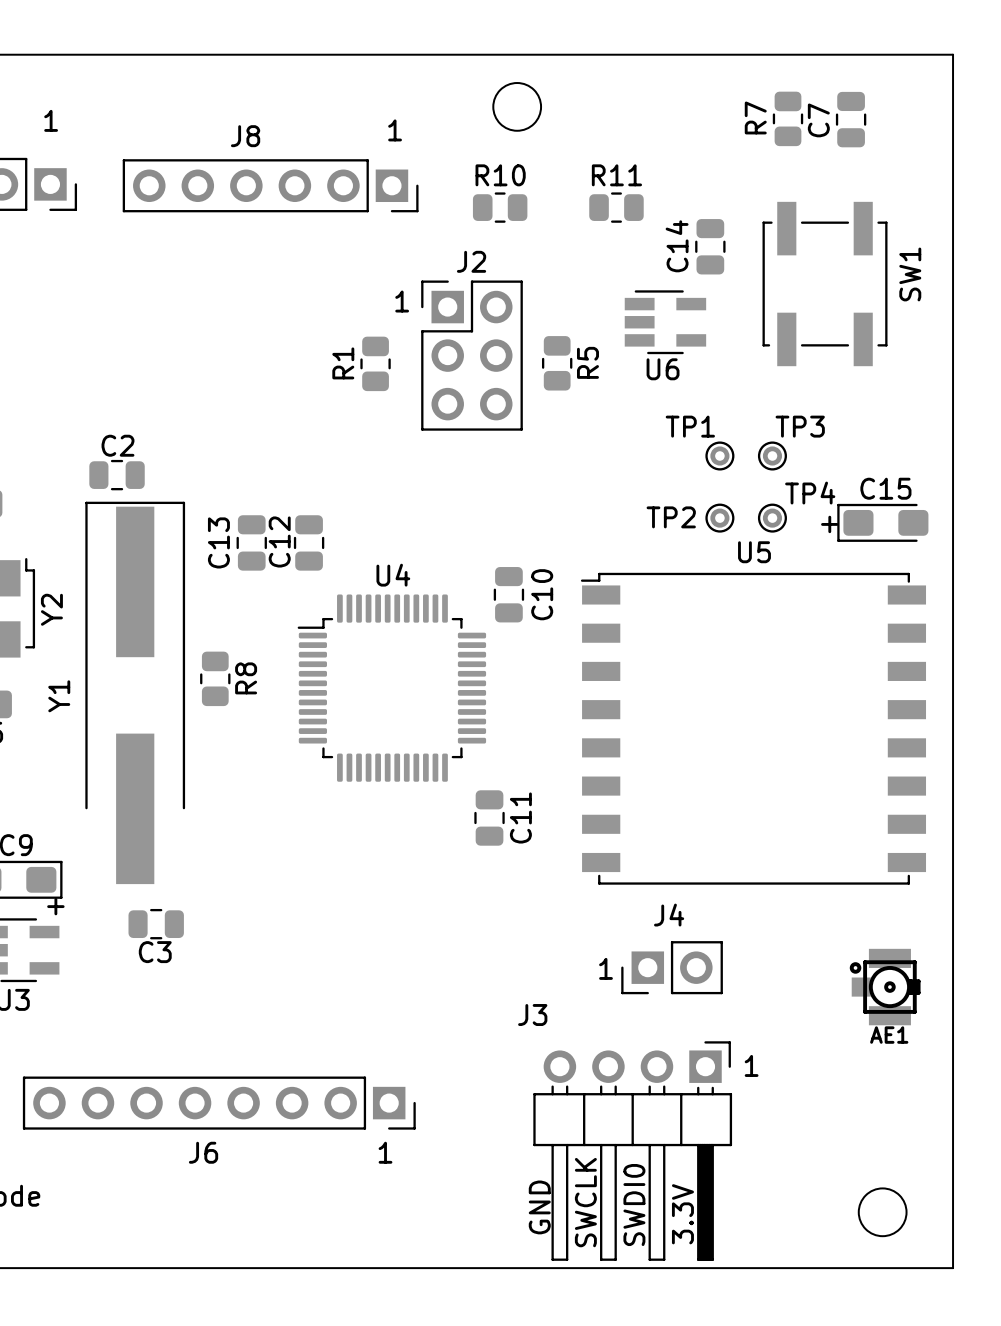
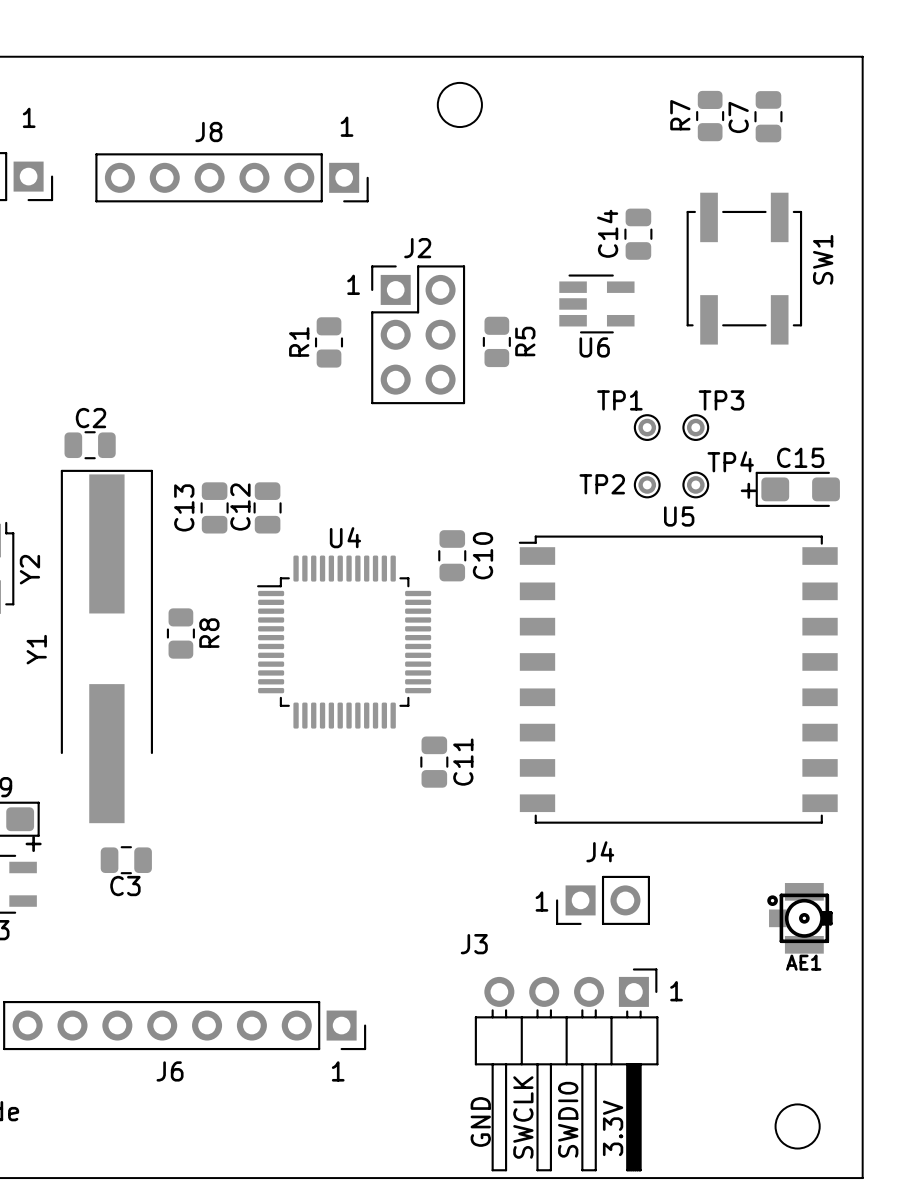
R10: (500, 207) -> none
R11: (616, 207) -> none

